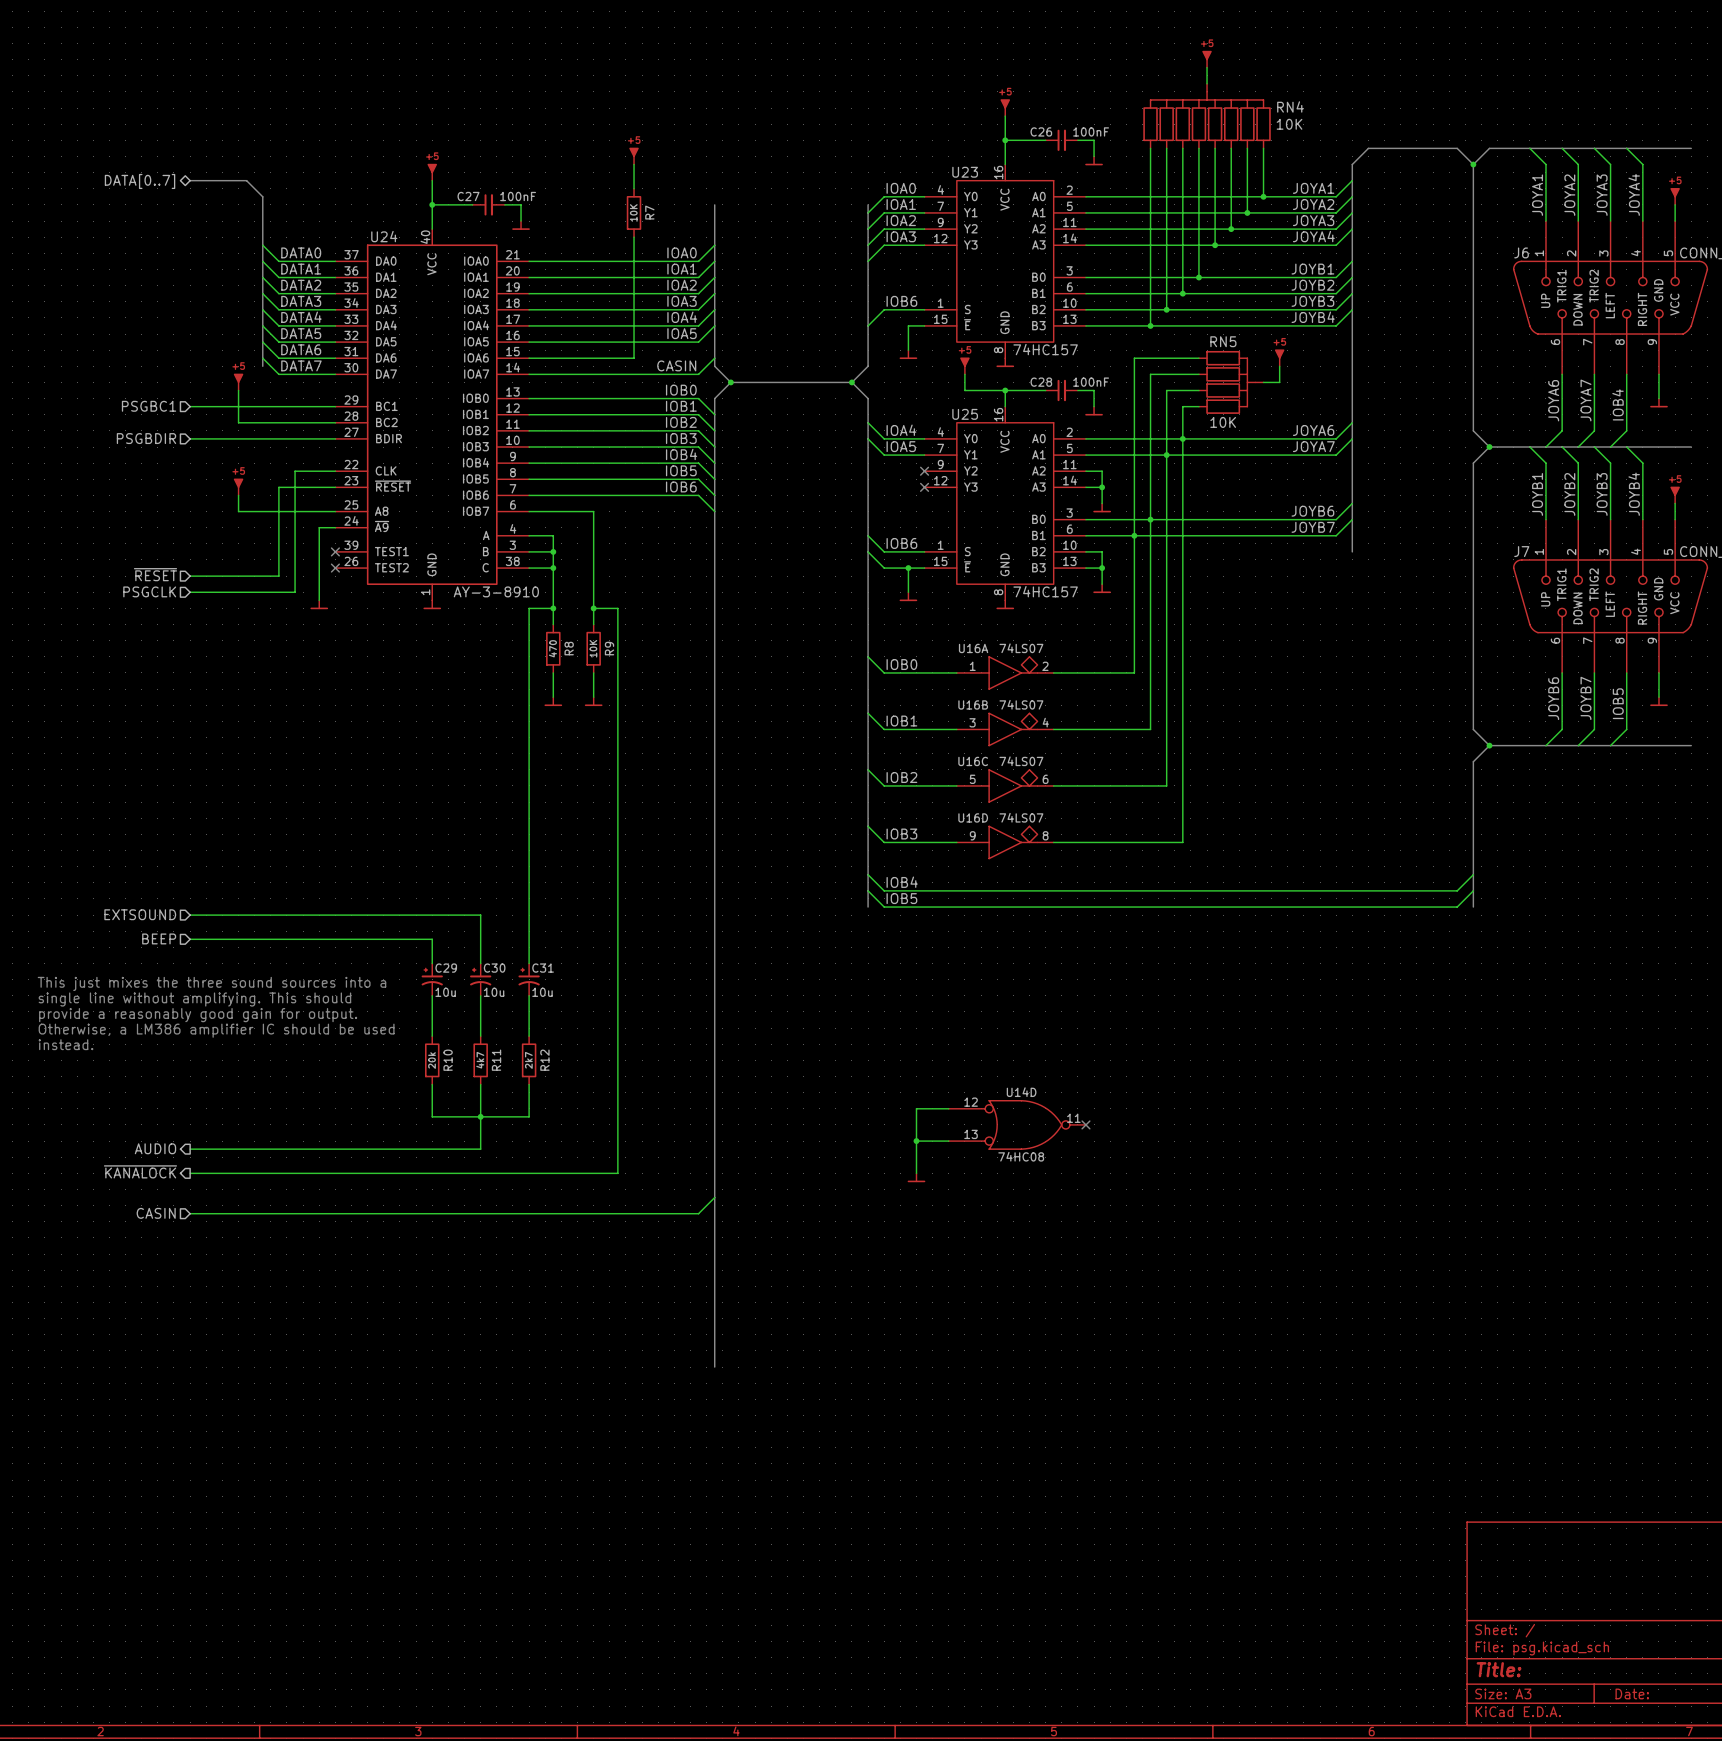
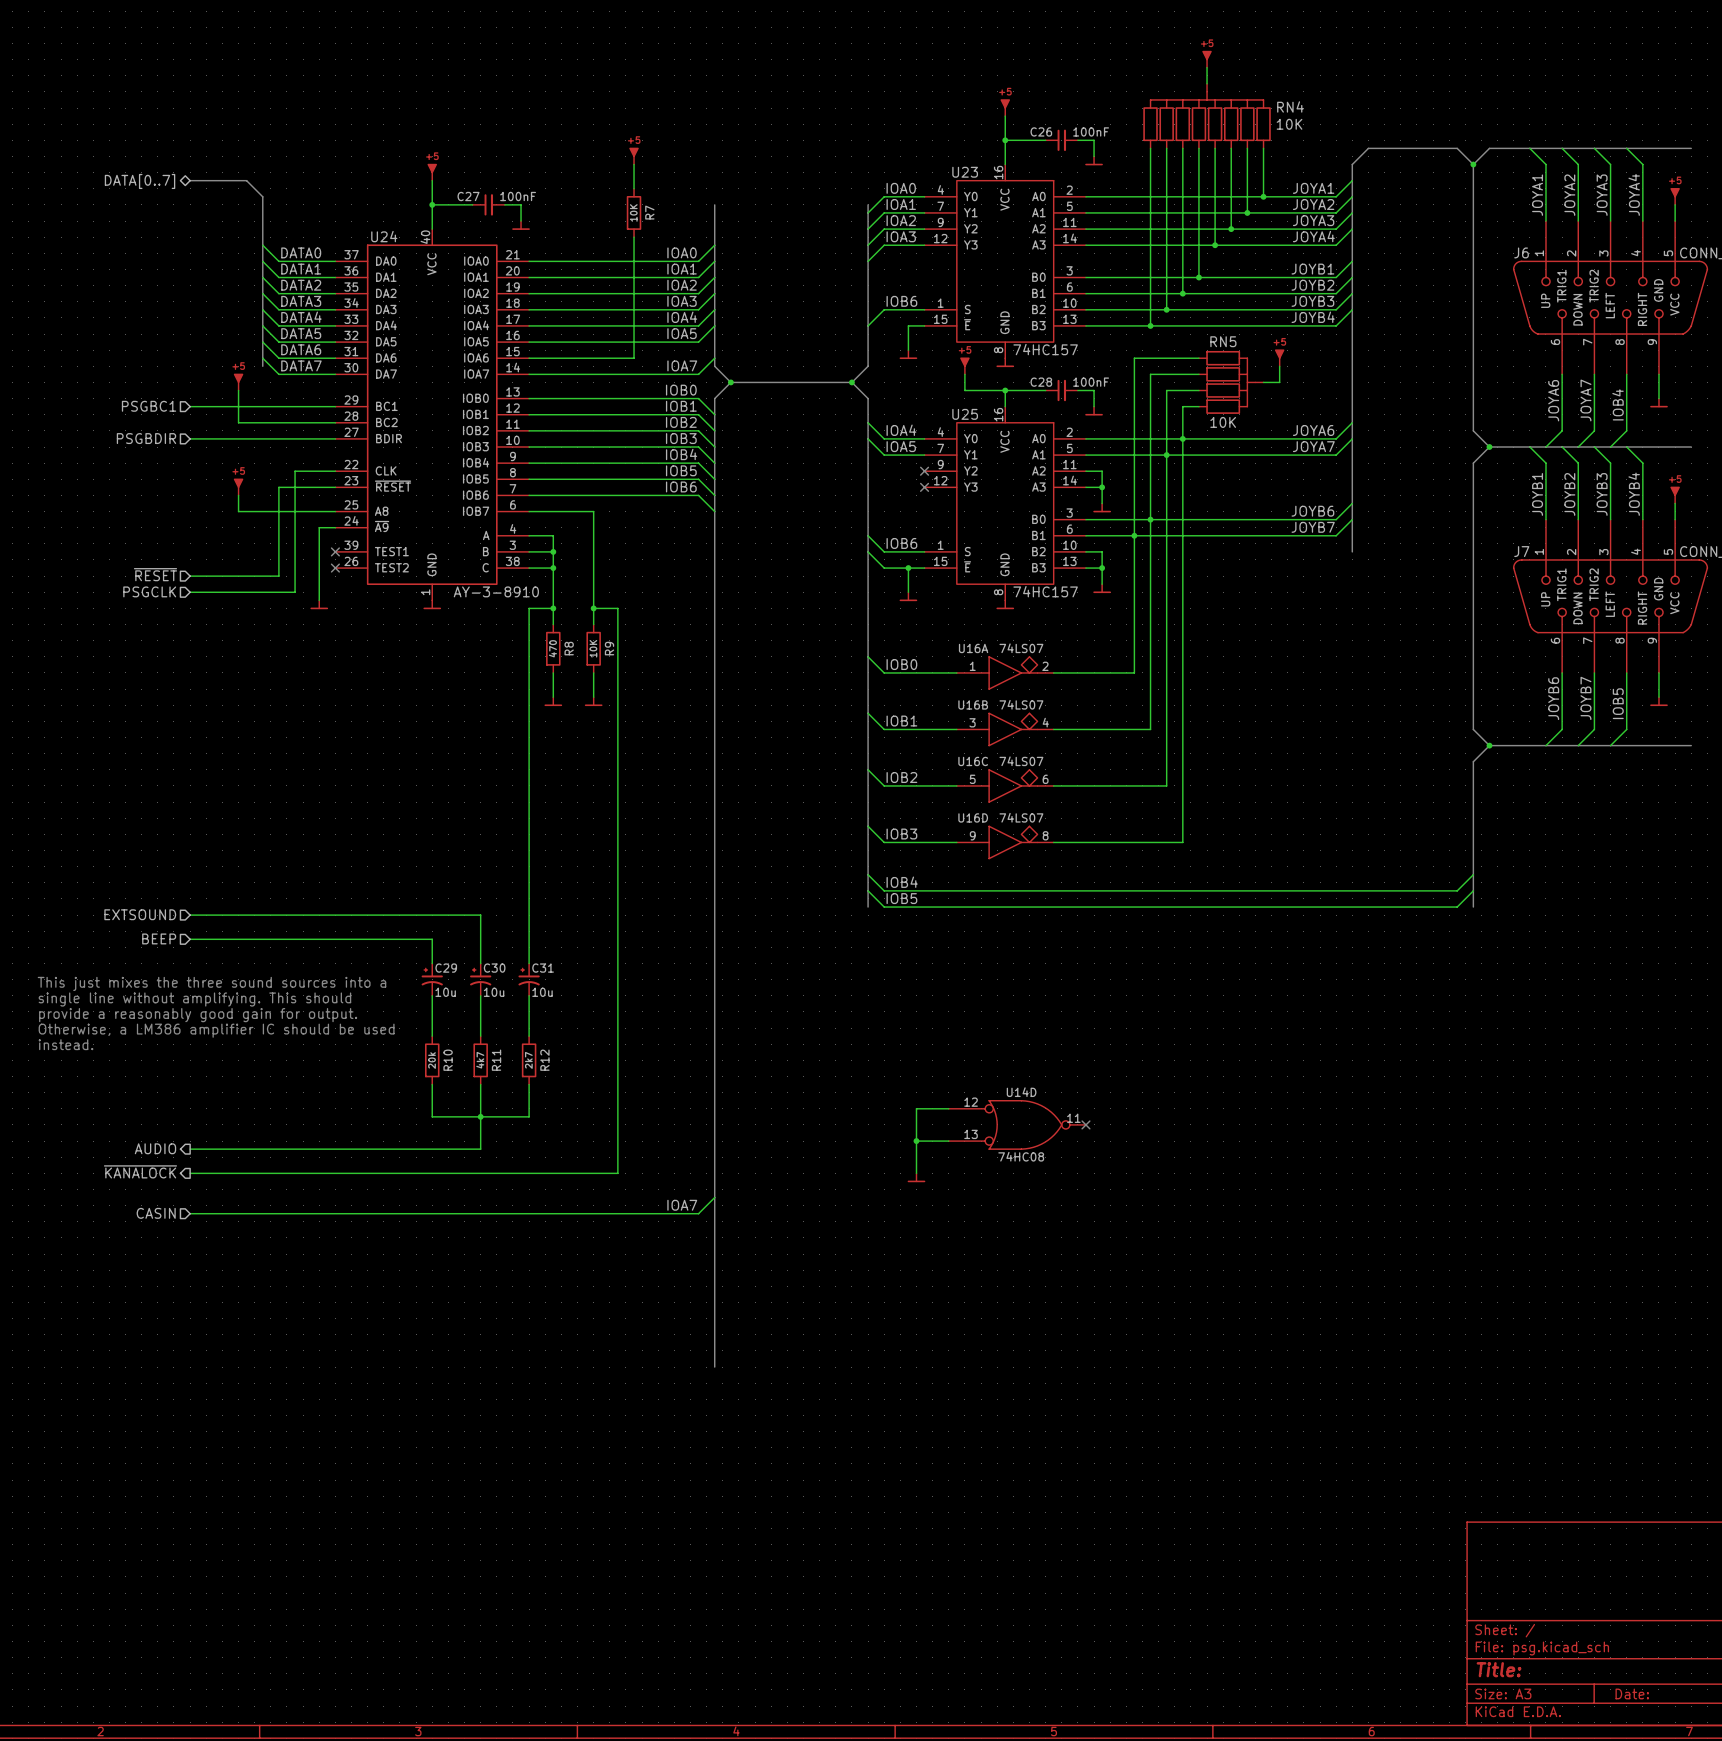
label: CASIN (676, 365) -> IOA7 (682, 365)
label: none -> IOA7 (682, 1205)

